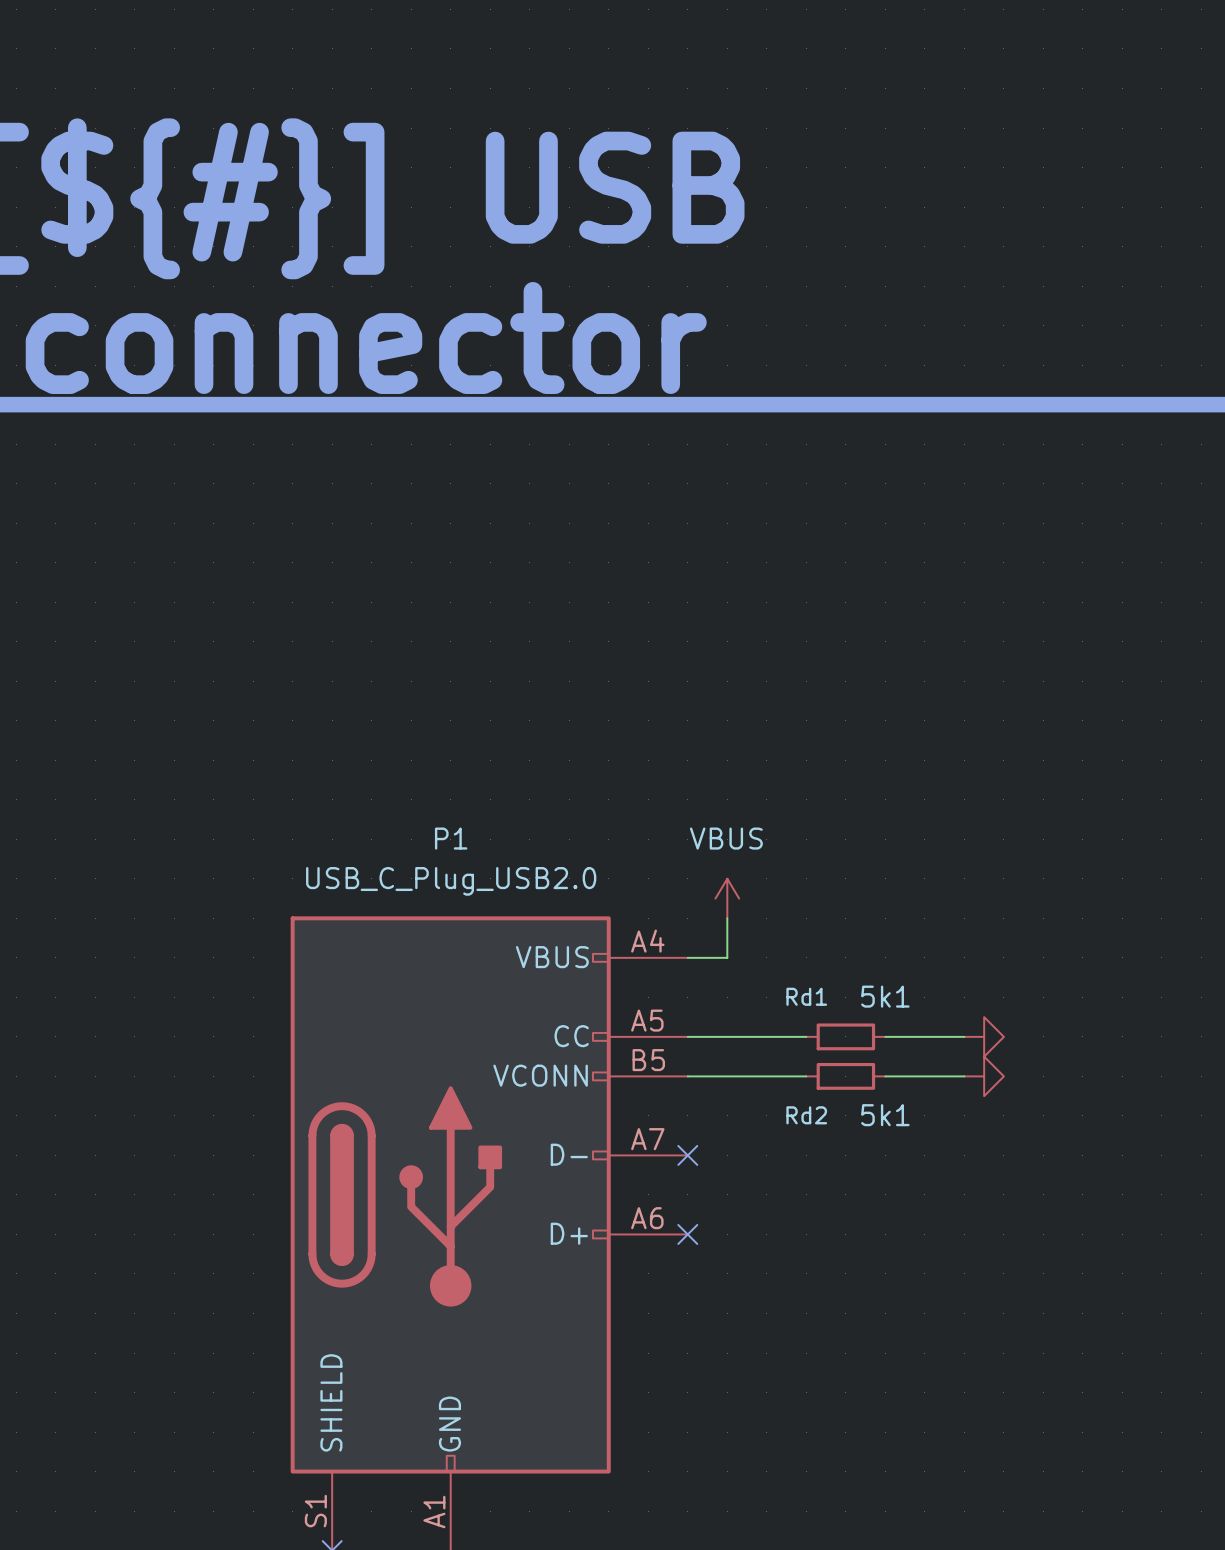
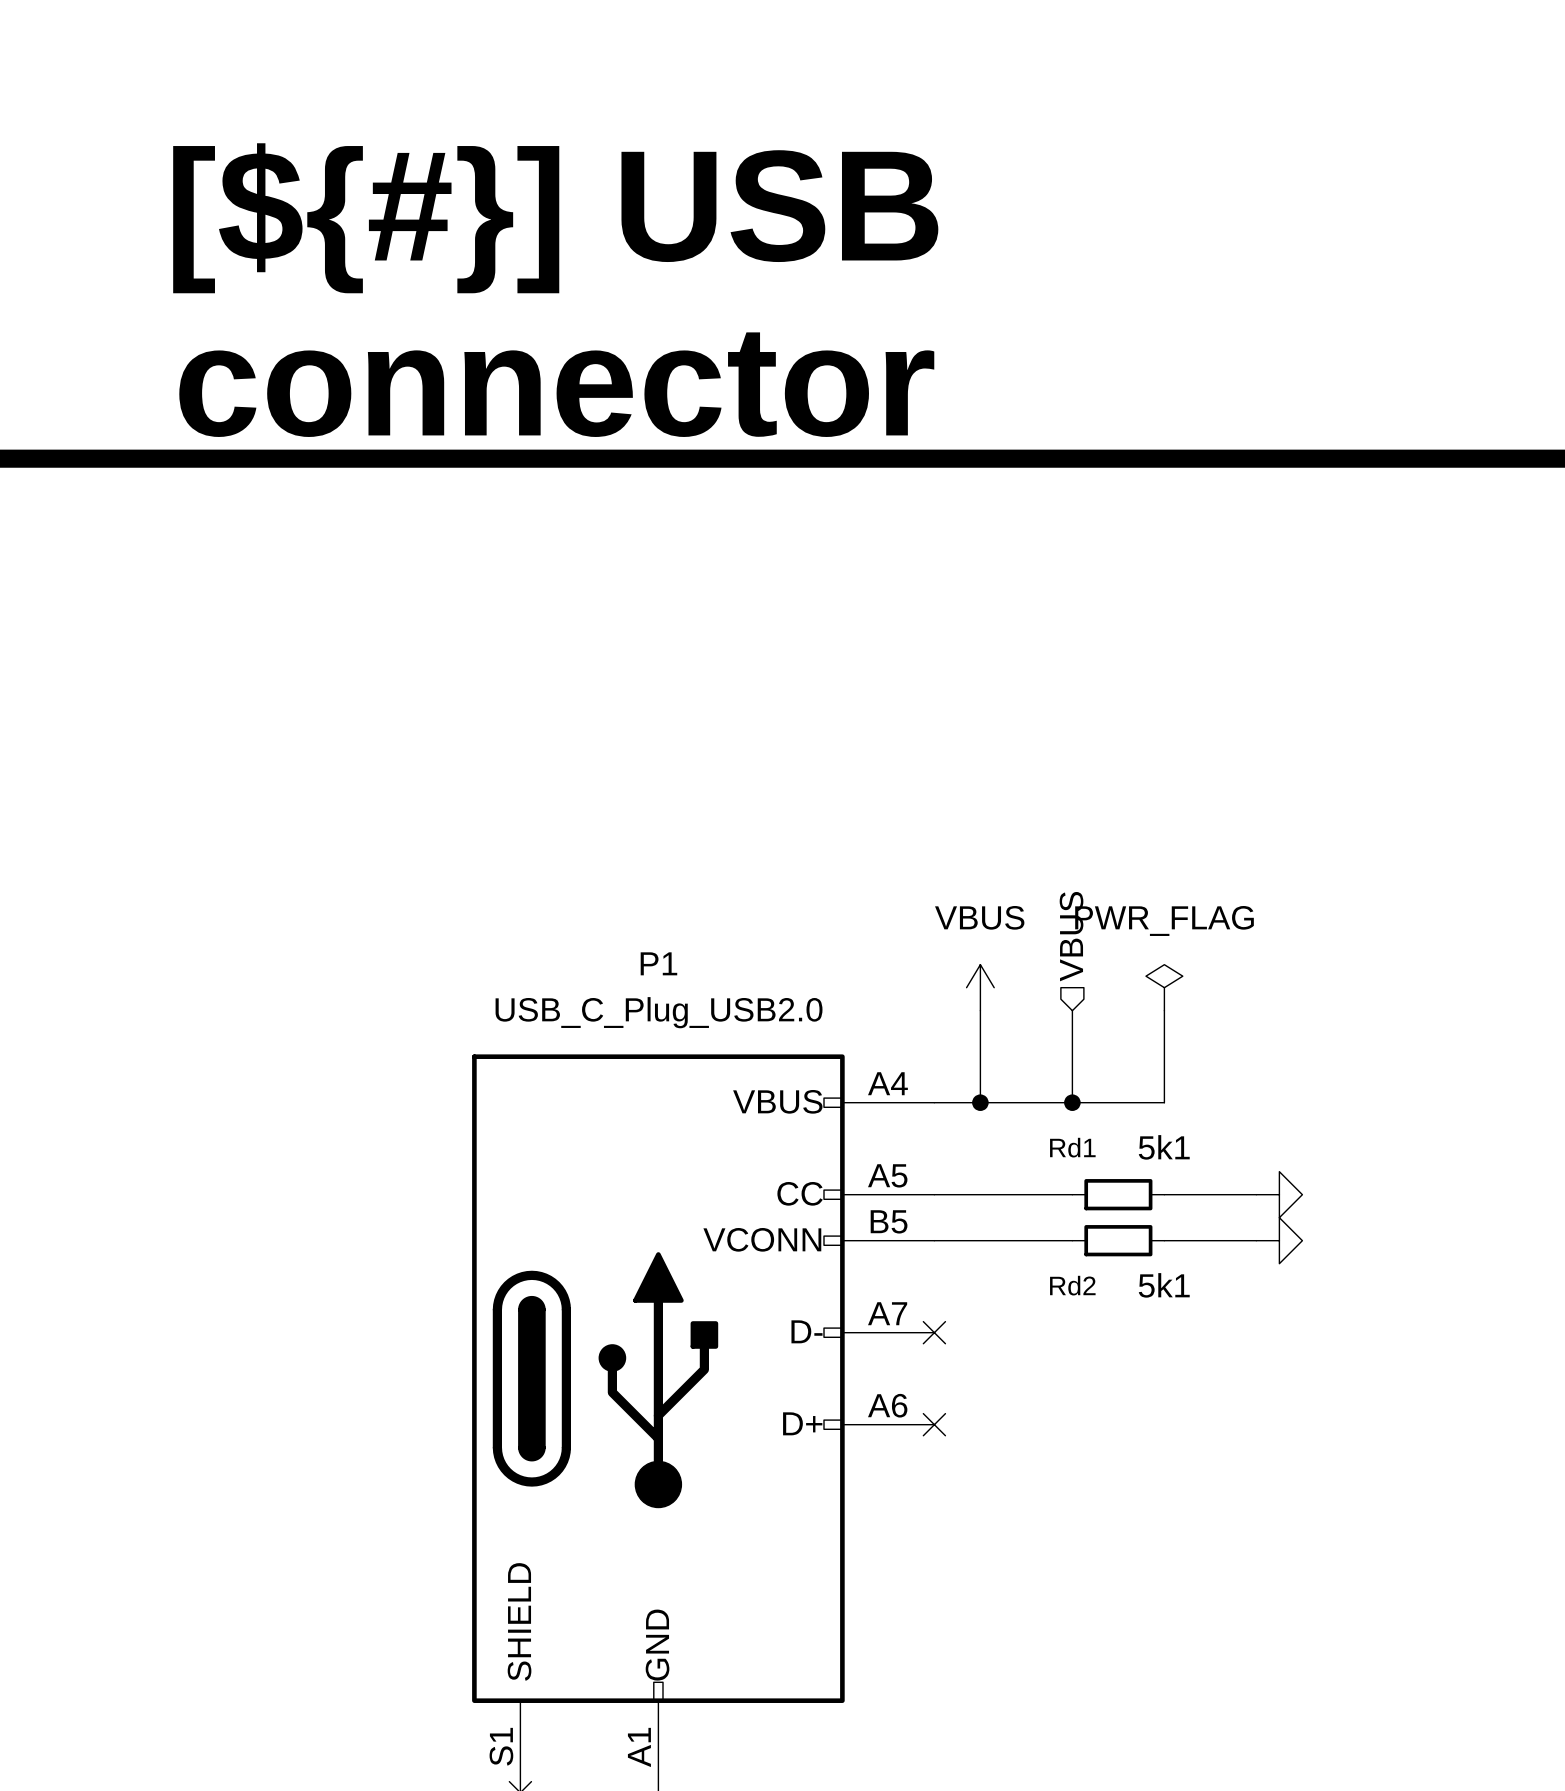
hierarchical label: none -> VBUS (1071, 936)
power symbol: none -> PWR_FLAG (1164, 987)
wire: none -> (1072, 1010) (1072, 1102)
wire: none -> (1164, 1010) (1164, 1102) (980, 1102)
power symbol position: VBUS (727, 898) -> VBUS (980, 987)
junction: none -> (980, 1102)
junction: none -> (1072, 1102)

